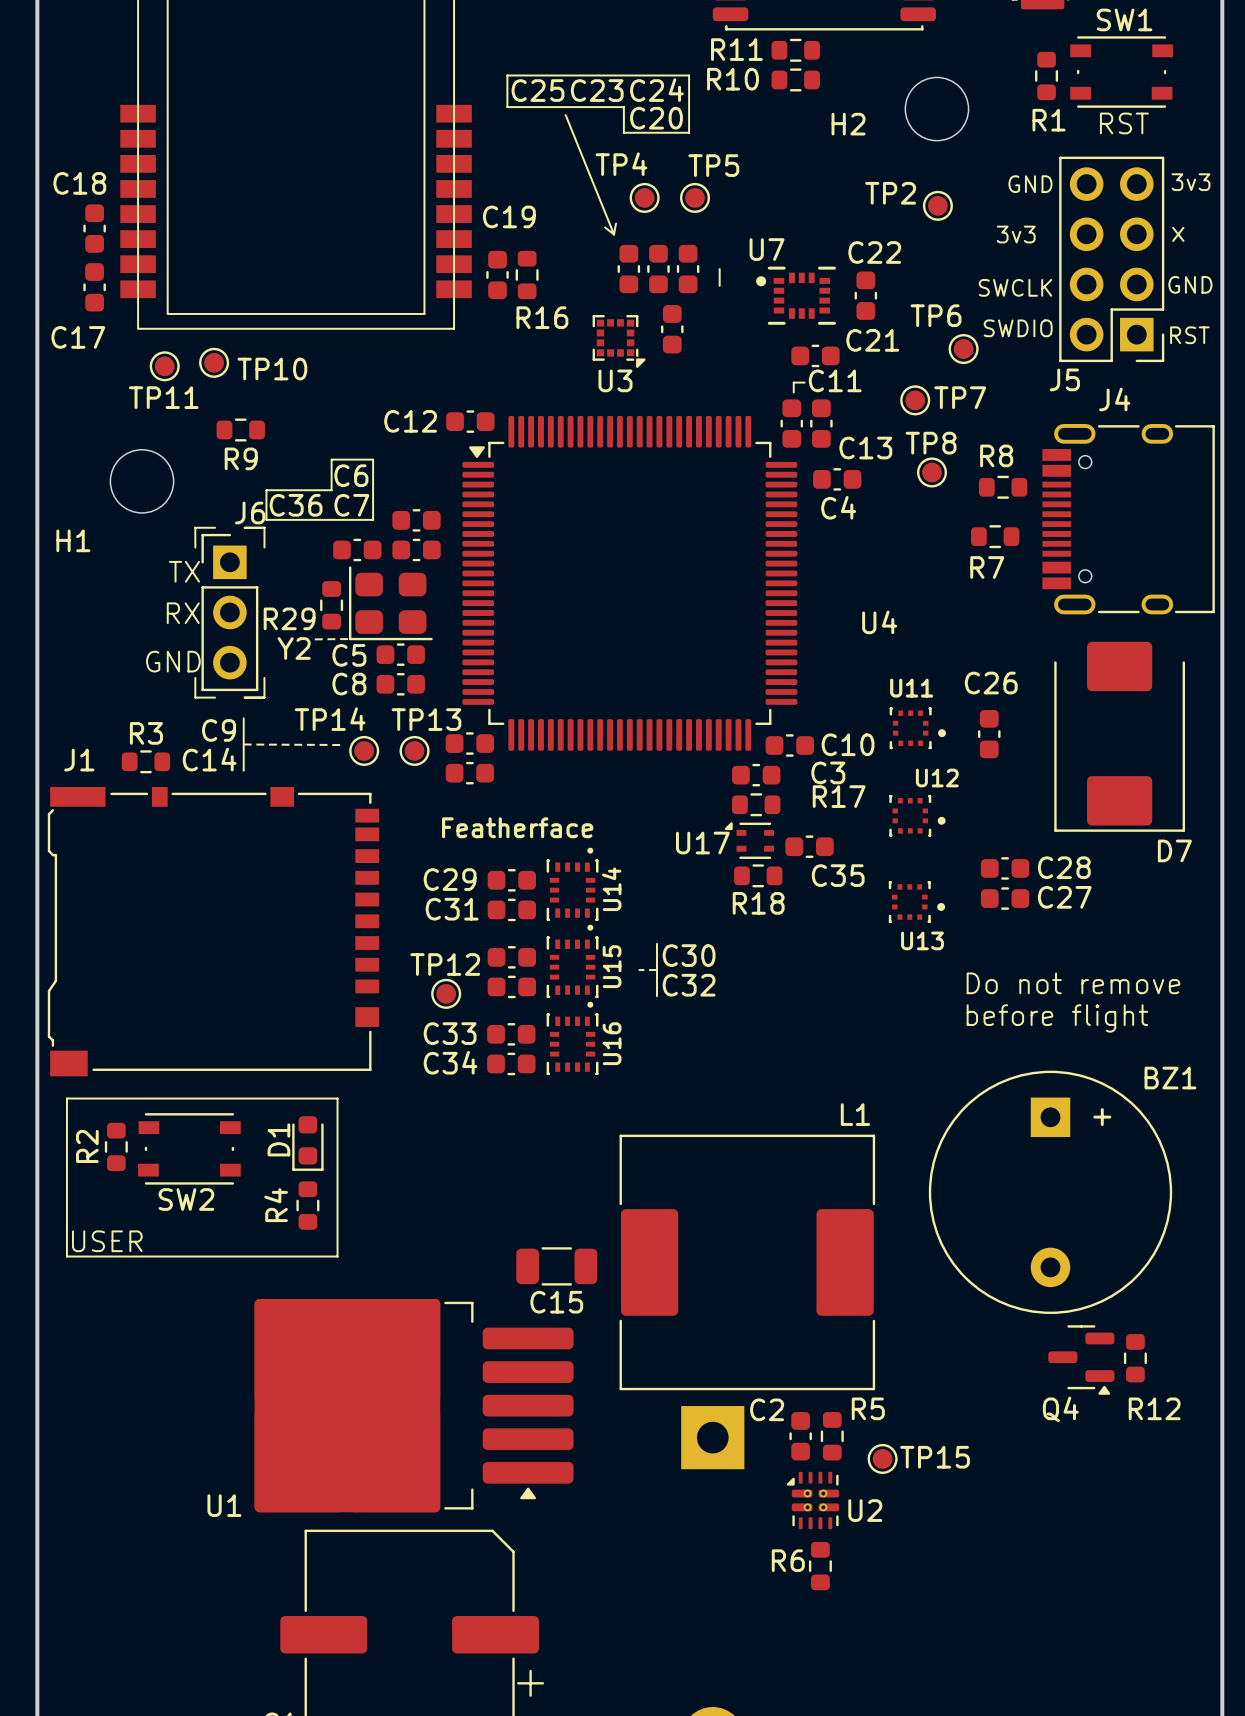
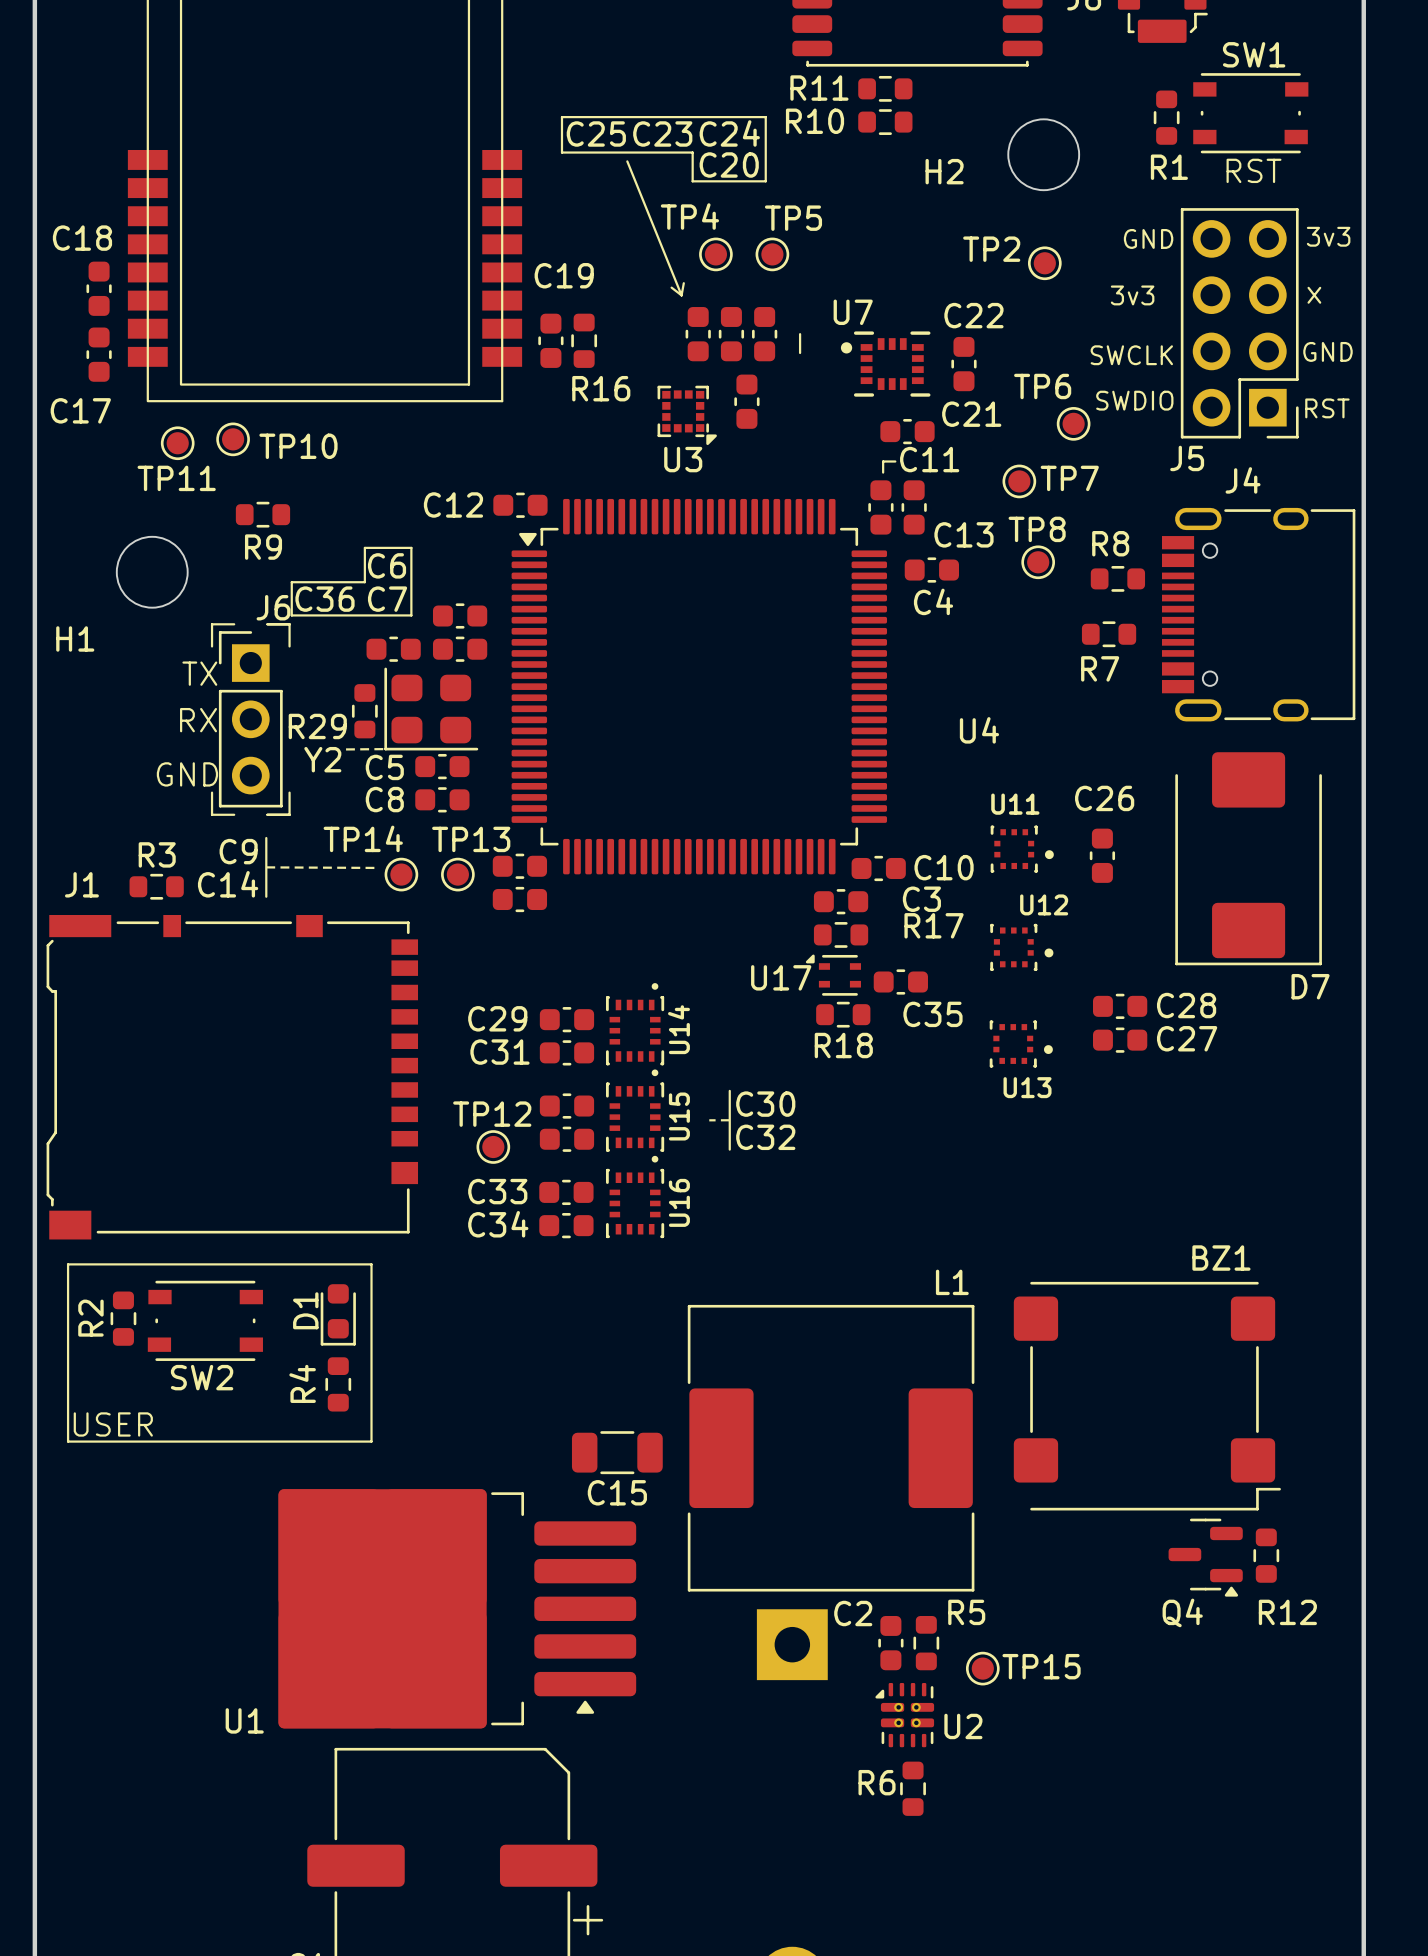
text: Featherface (517, 827) -> none
text: Do not remove (1073, 983) -> none
text: before flight (1057, 1018) -> none
BZ1 footprint: [928, 1070, 1173, 1315] -> [1013, 1281, 1281, 1511]
BZ1 name position: BZ1 (1170, 1078) -> BZ1 (1221, 1258)

